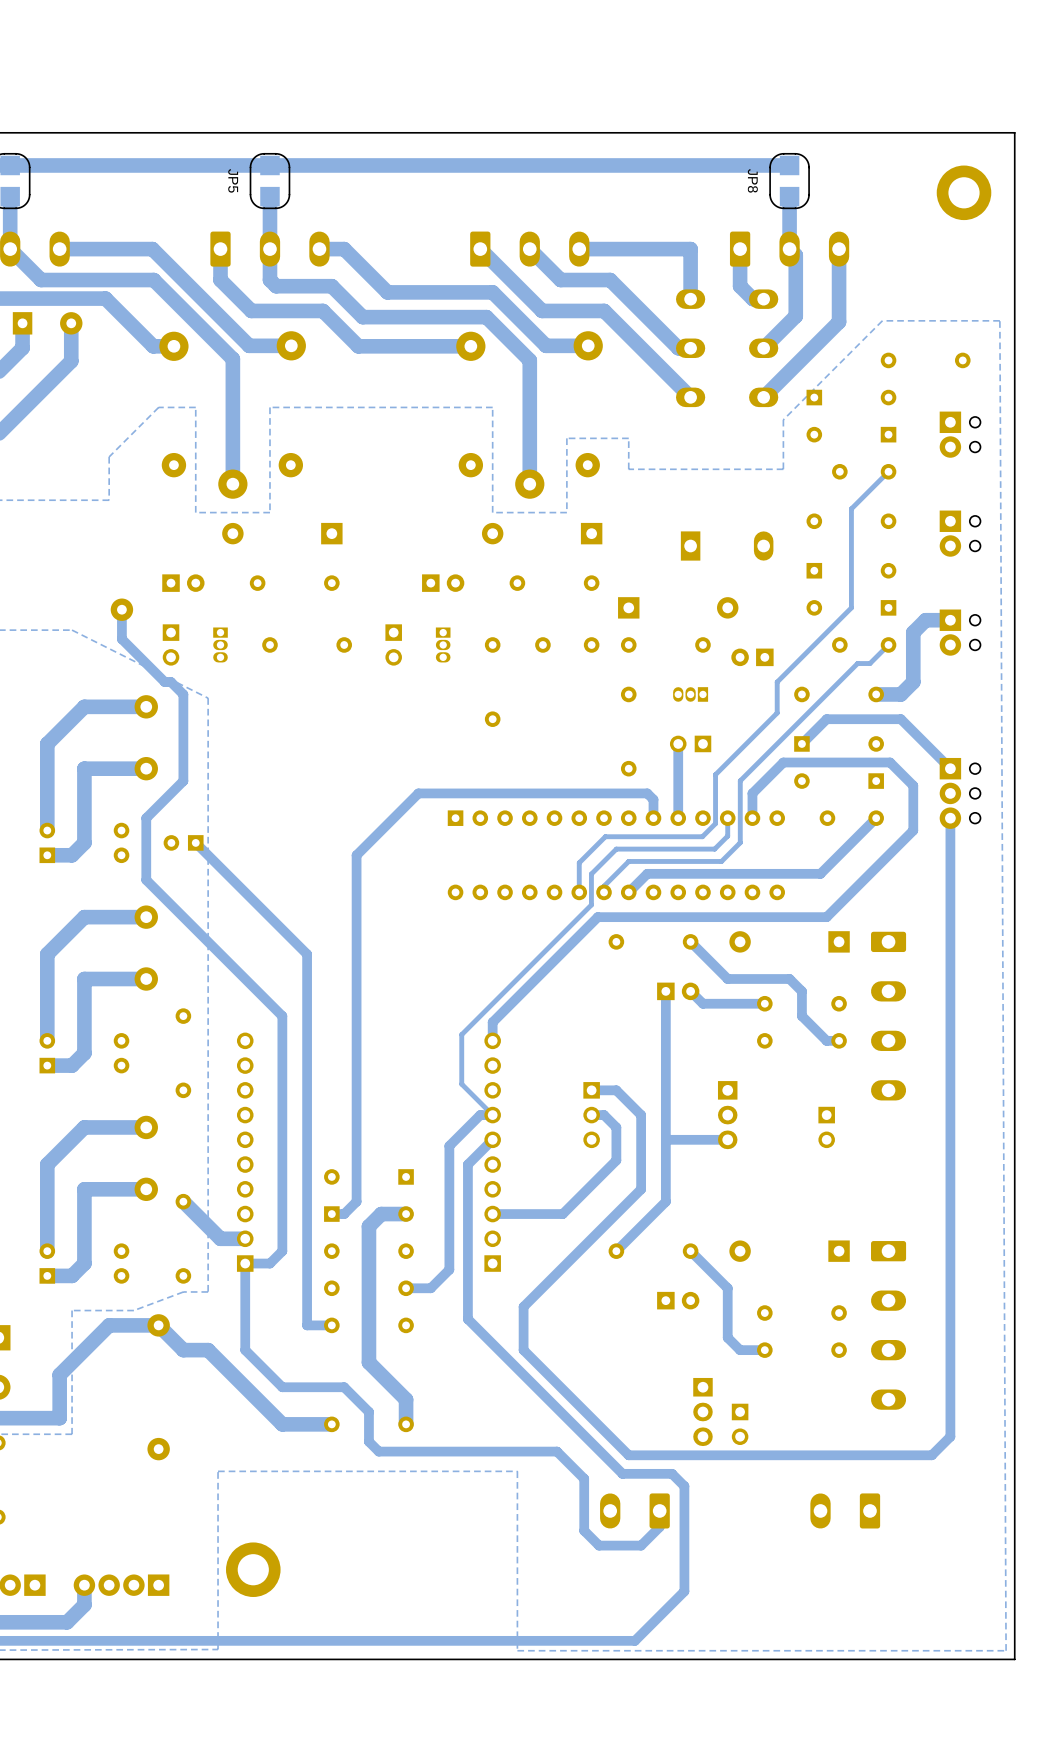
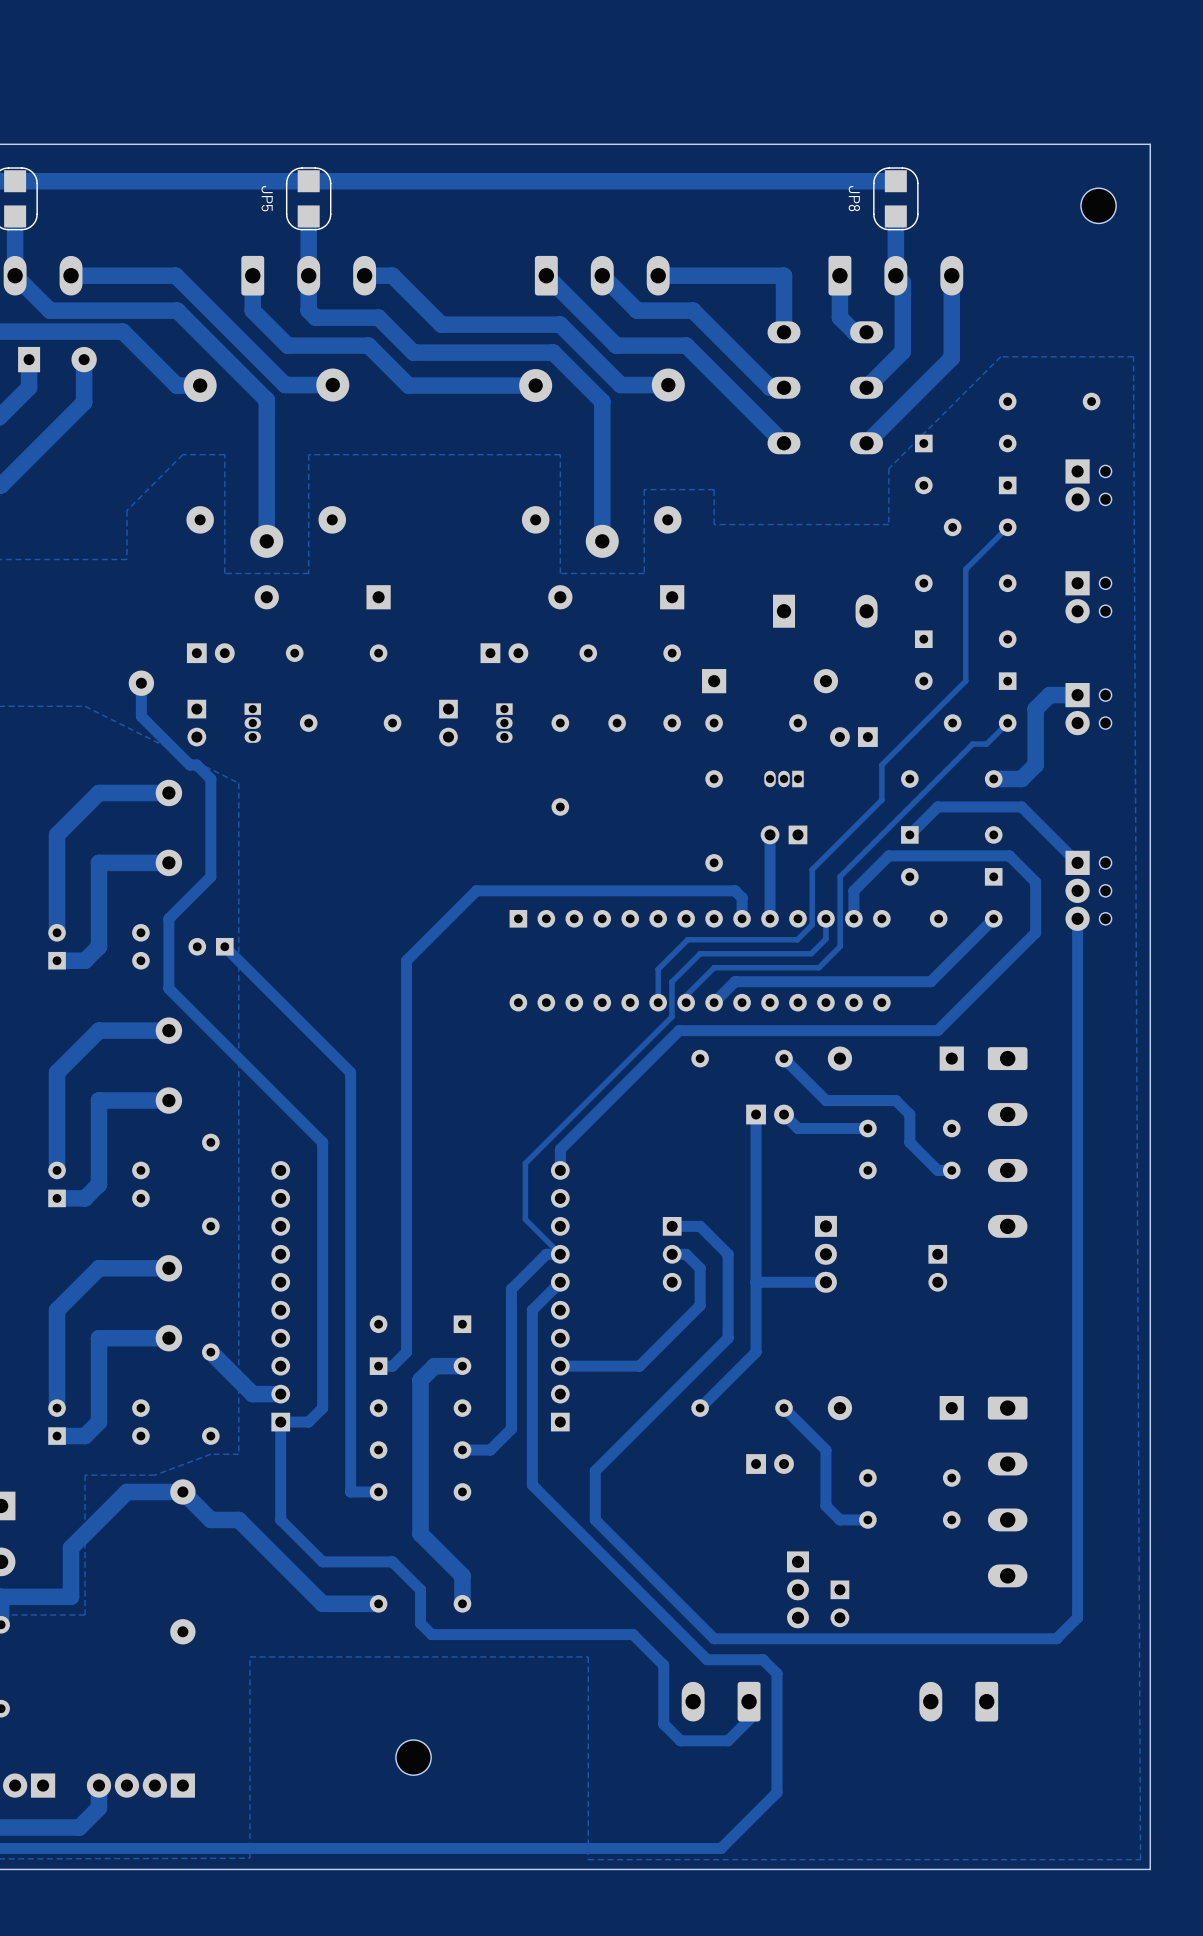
part footprint: [936, 165, 992, 221] -> [1080, 188, 1117, 224]
part: none -> (413, 1757)
part: (253, 1569) -> none

